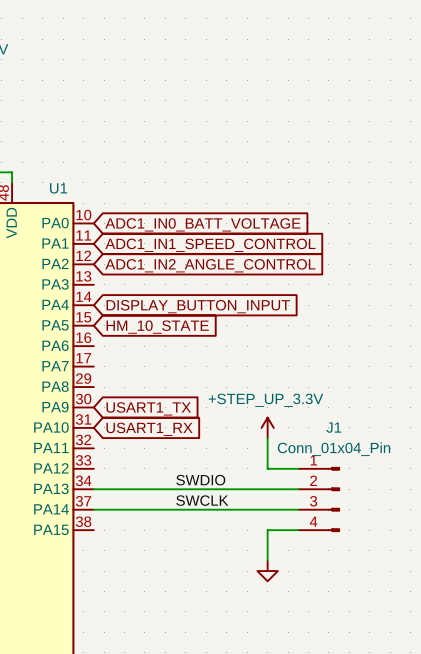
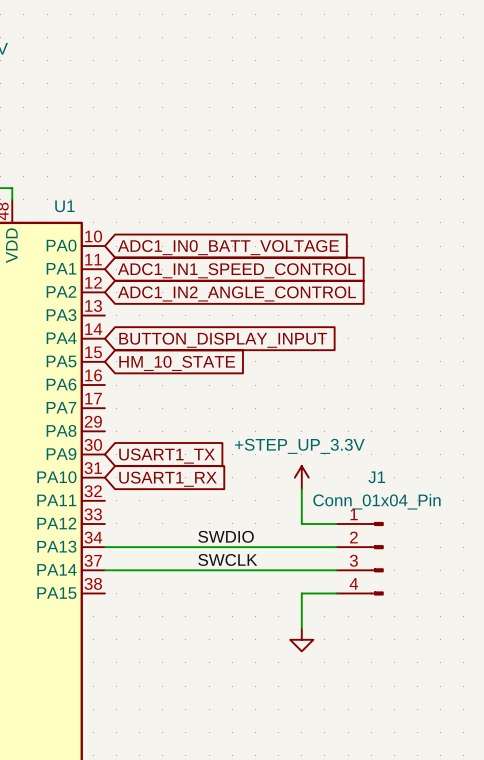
global label: DISPLAY_BUTTON_INPUT (198, 306) -> BUTTON_DISPLAY_INPUT (223, 340)

